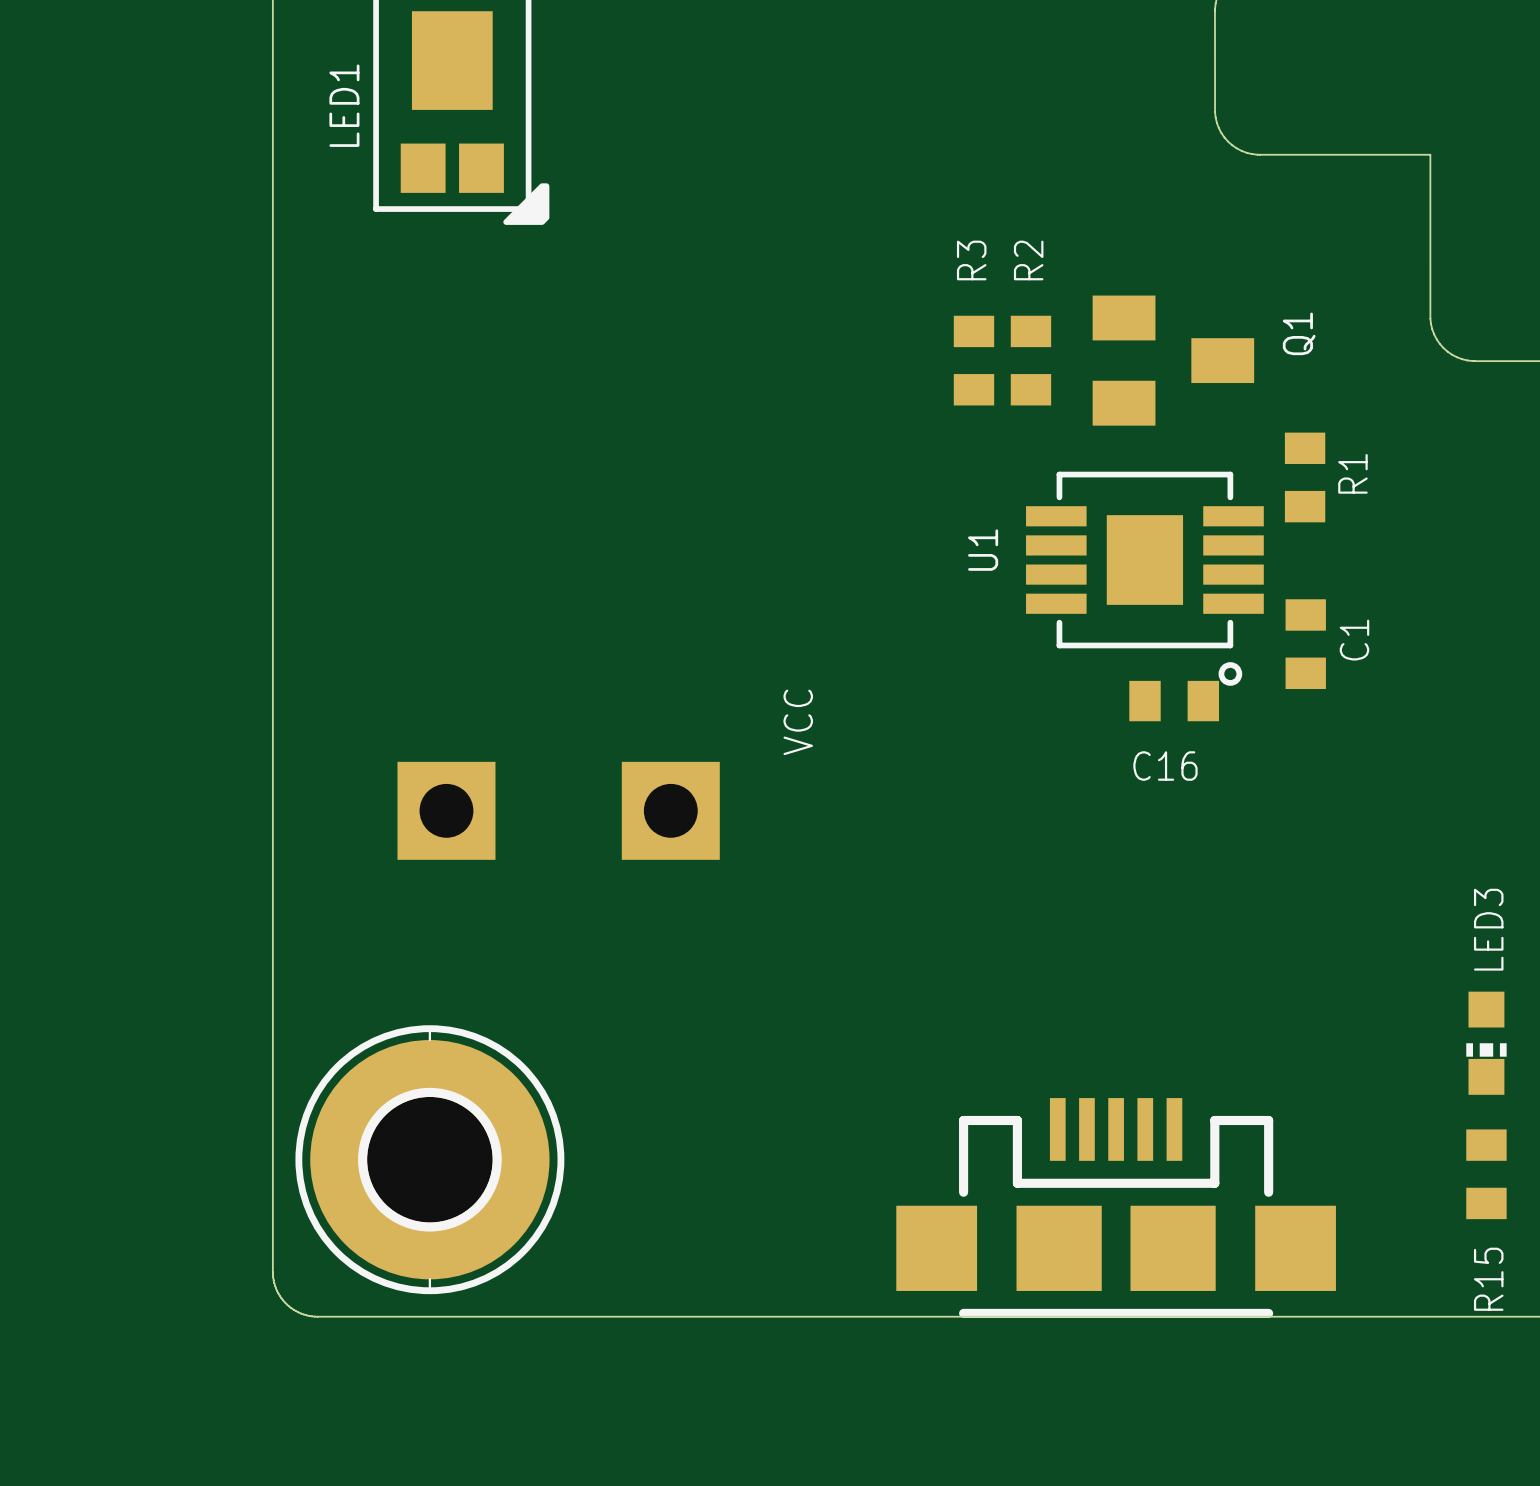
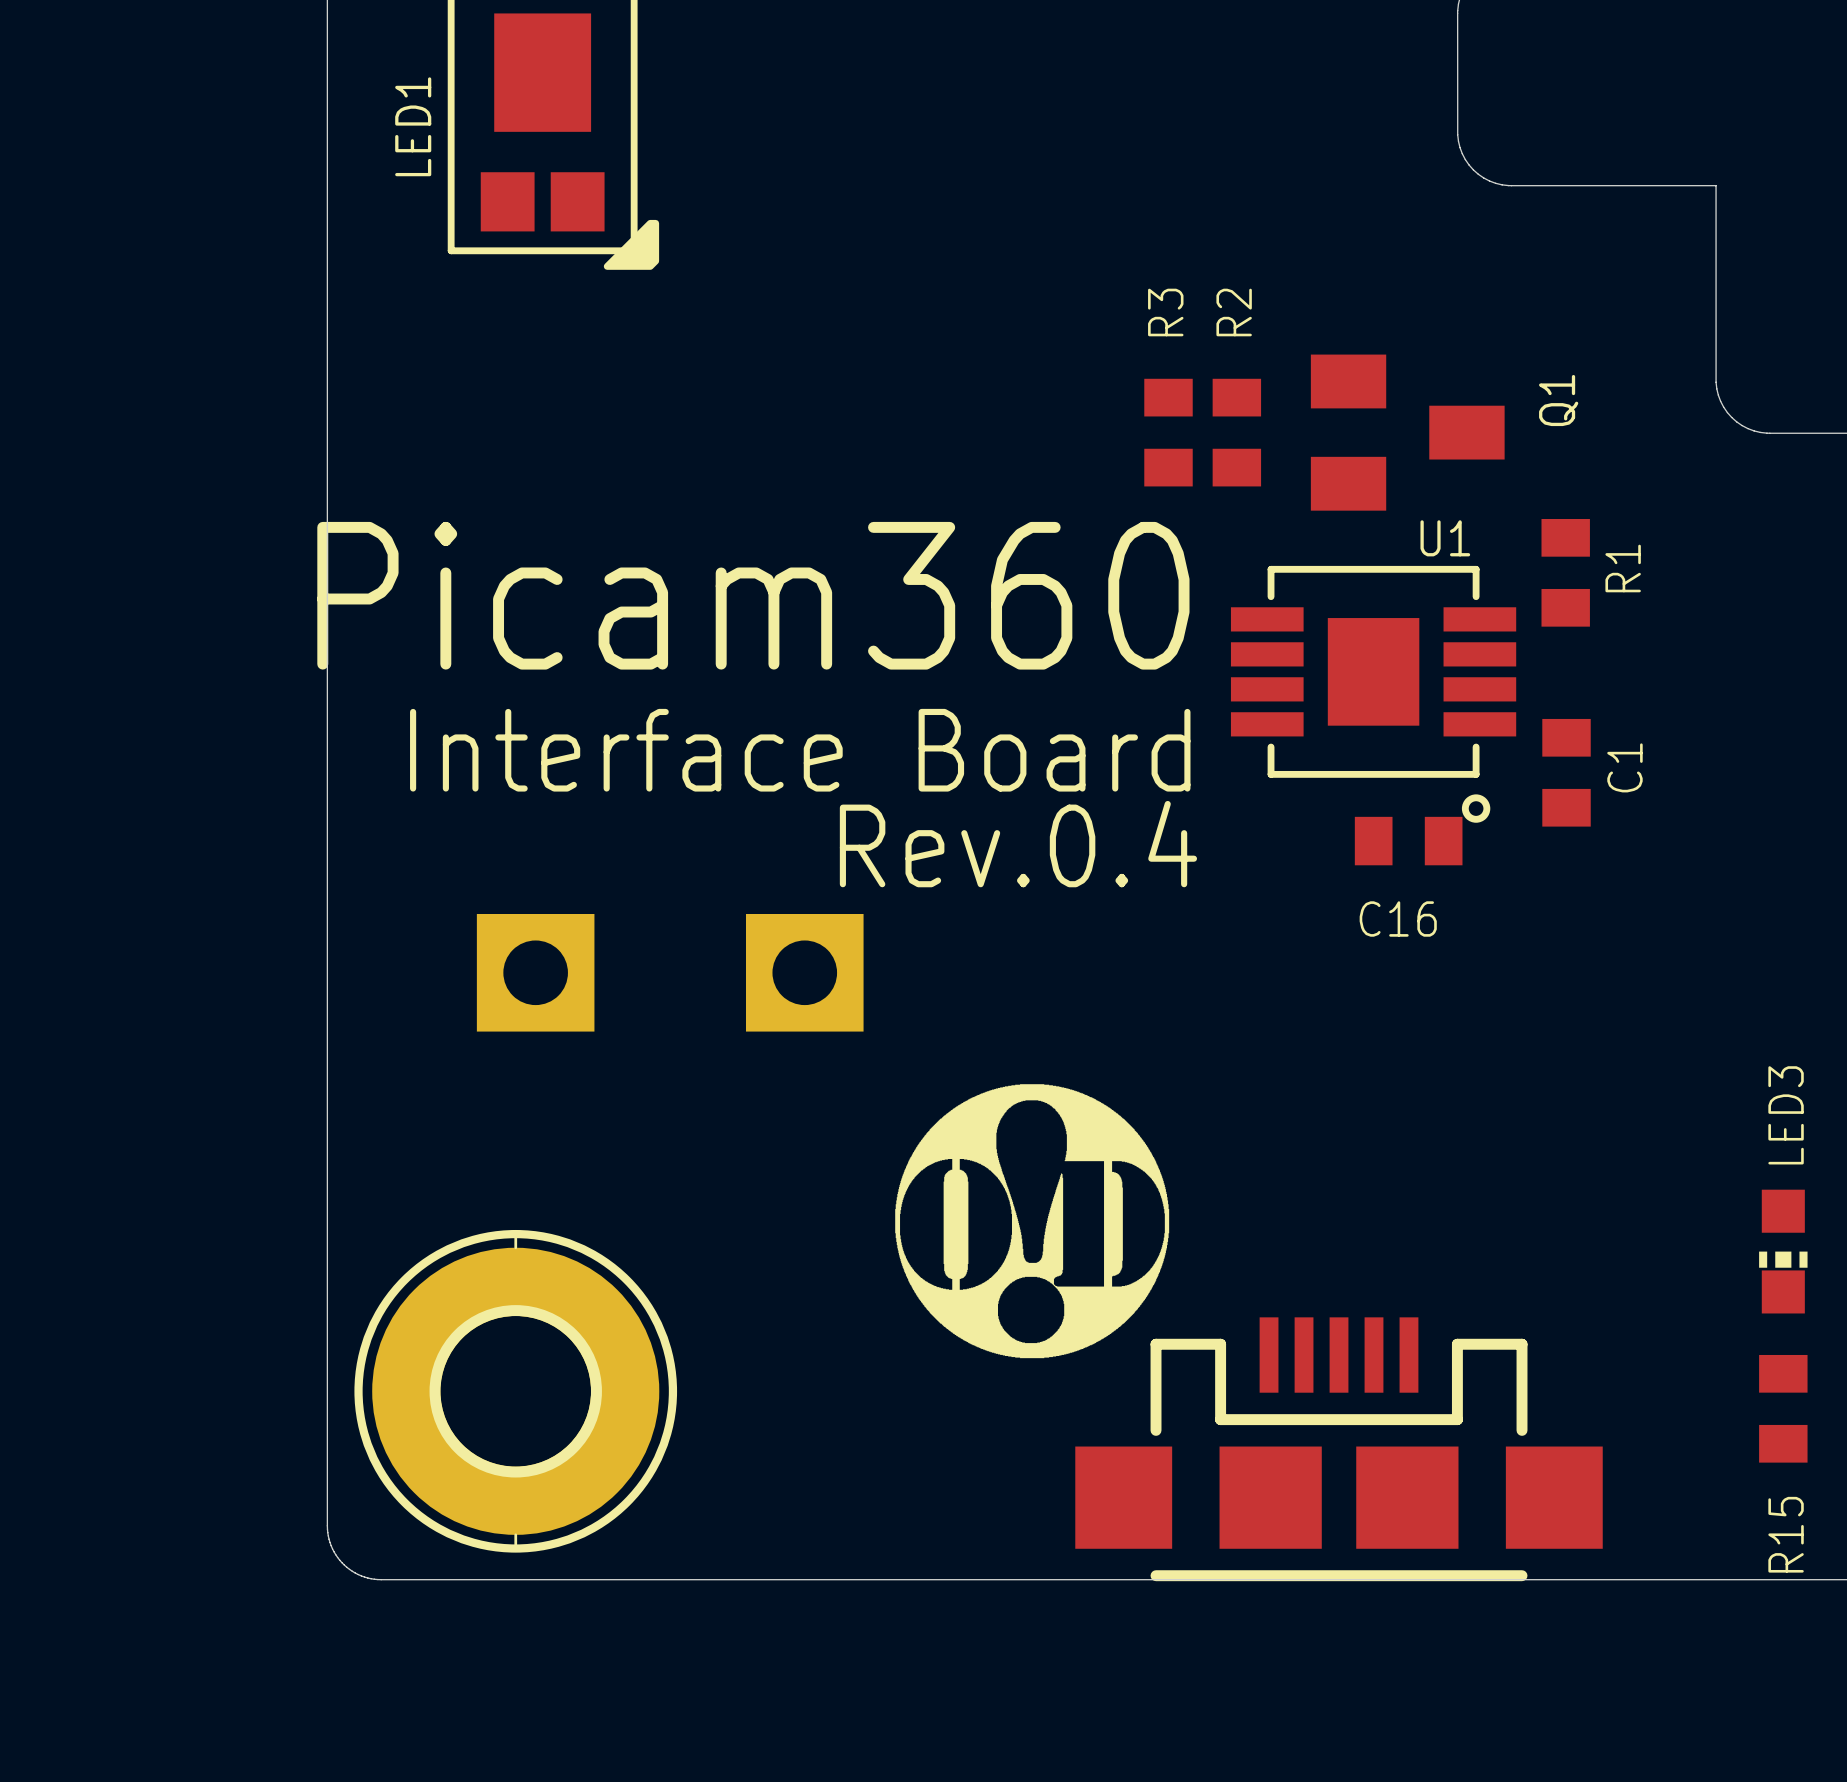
text: none -> Picam360 (753, 595)
U1 name rotation: 0° (983, 550) -> 90° clockwise (1445, 538)
U1 name position: U1 (983, 550) -> U1 (1445, 538)
text: none -> Interface Board (800, 750)
text: none -> Rev.0.4 (1018, 844)
text: VCC (798, 722) -> none
drawing: none -> [895, 1084, 1170, 1359]

